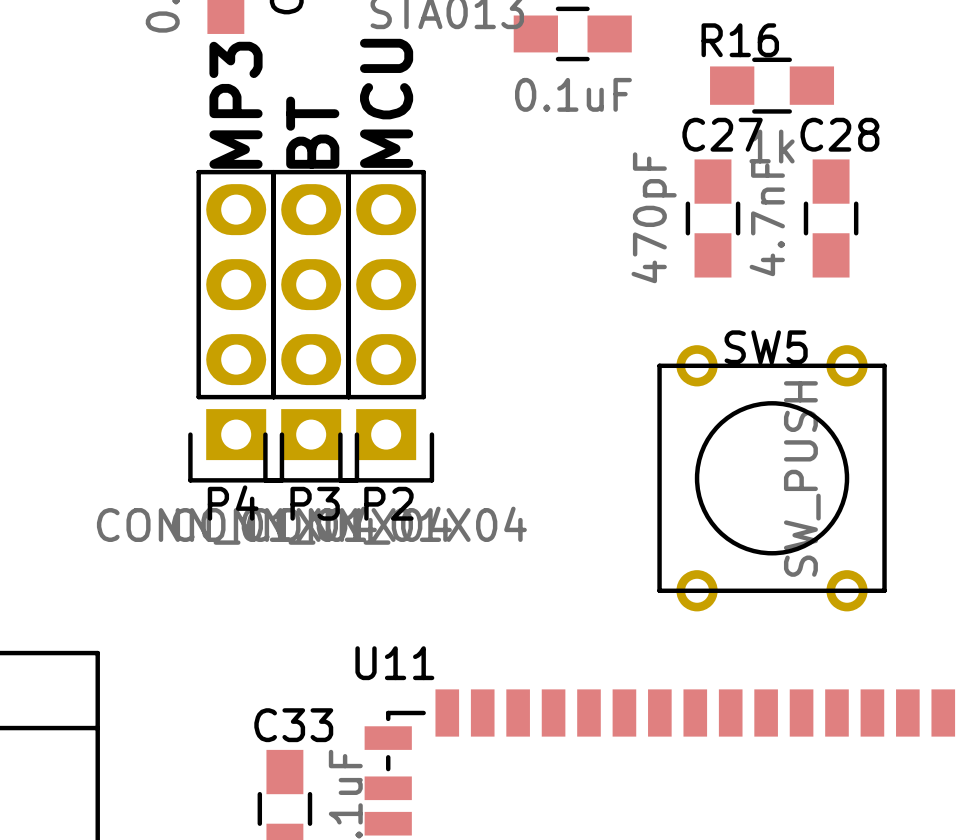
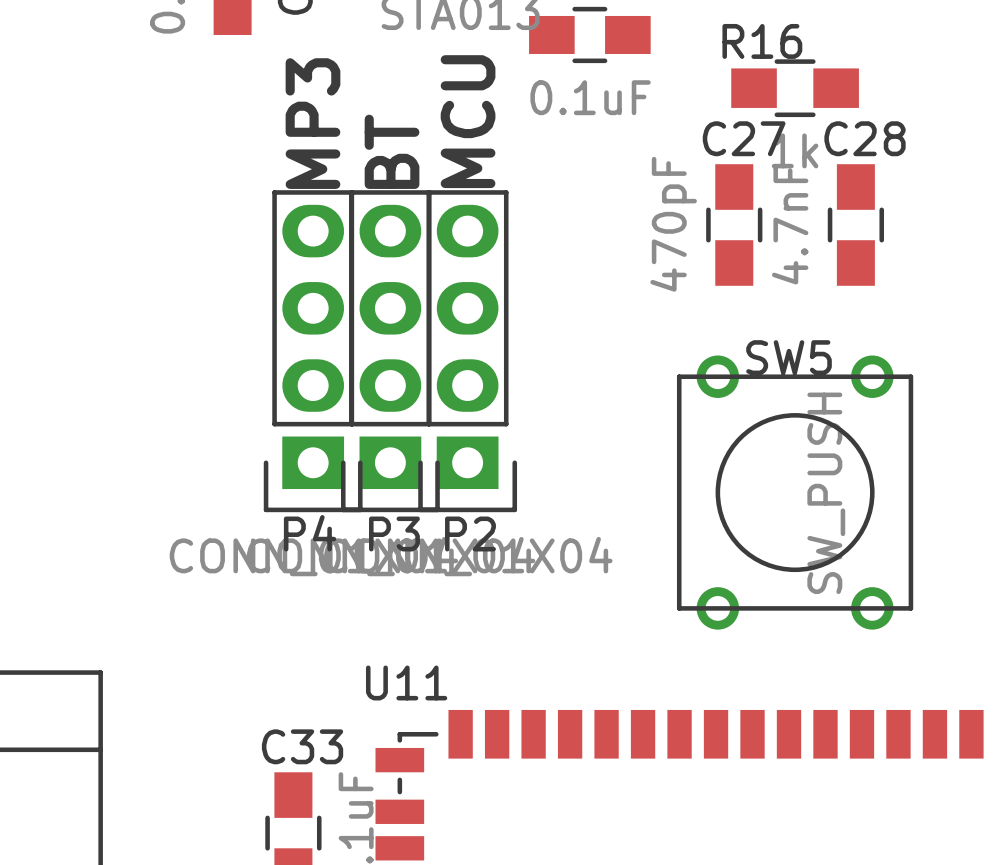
text position: MCU (386, 103) -> MCU (468, 121)
text: MP3 (236, 105) -> none
text: BT (312, 132) -> MP3 (312, 123)
text: none -> BT (392, 151)
P4 position: (236, 326) -> (313, 351)
P3 position: (311, 326) -> (390, 351)
P2 position: (386, 326) -> (467, 351)

